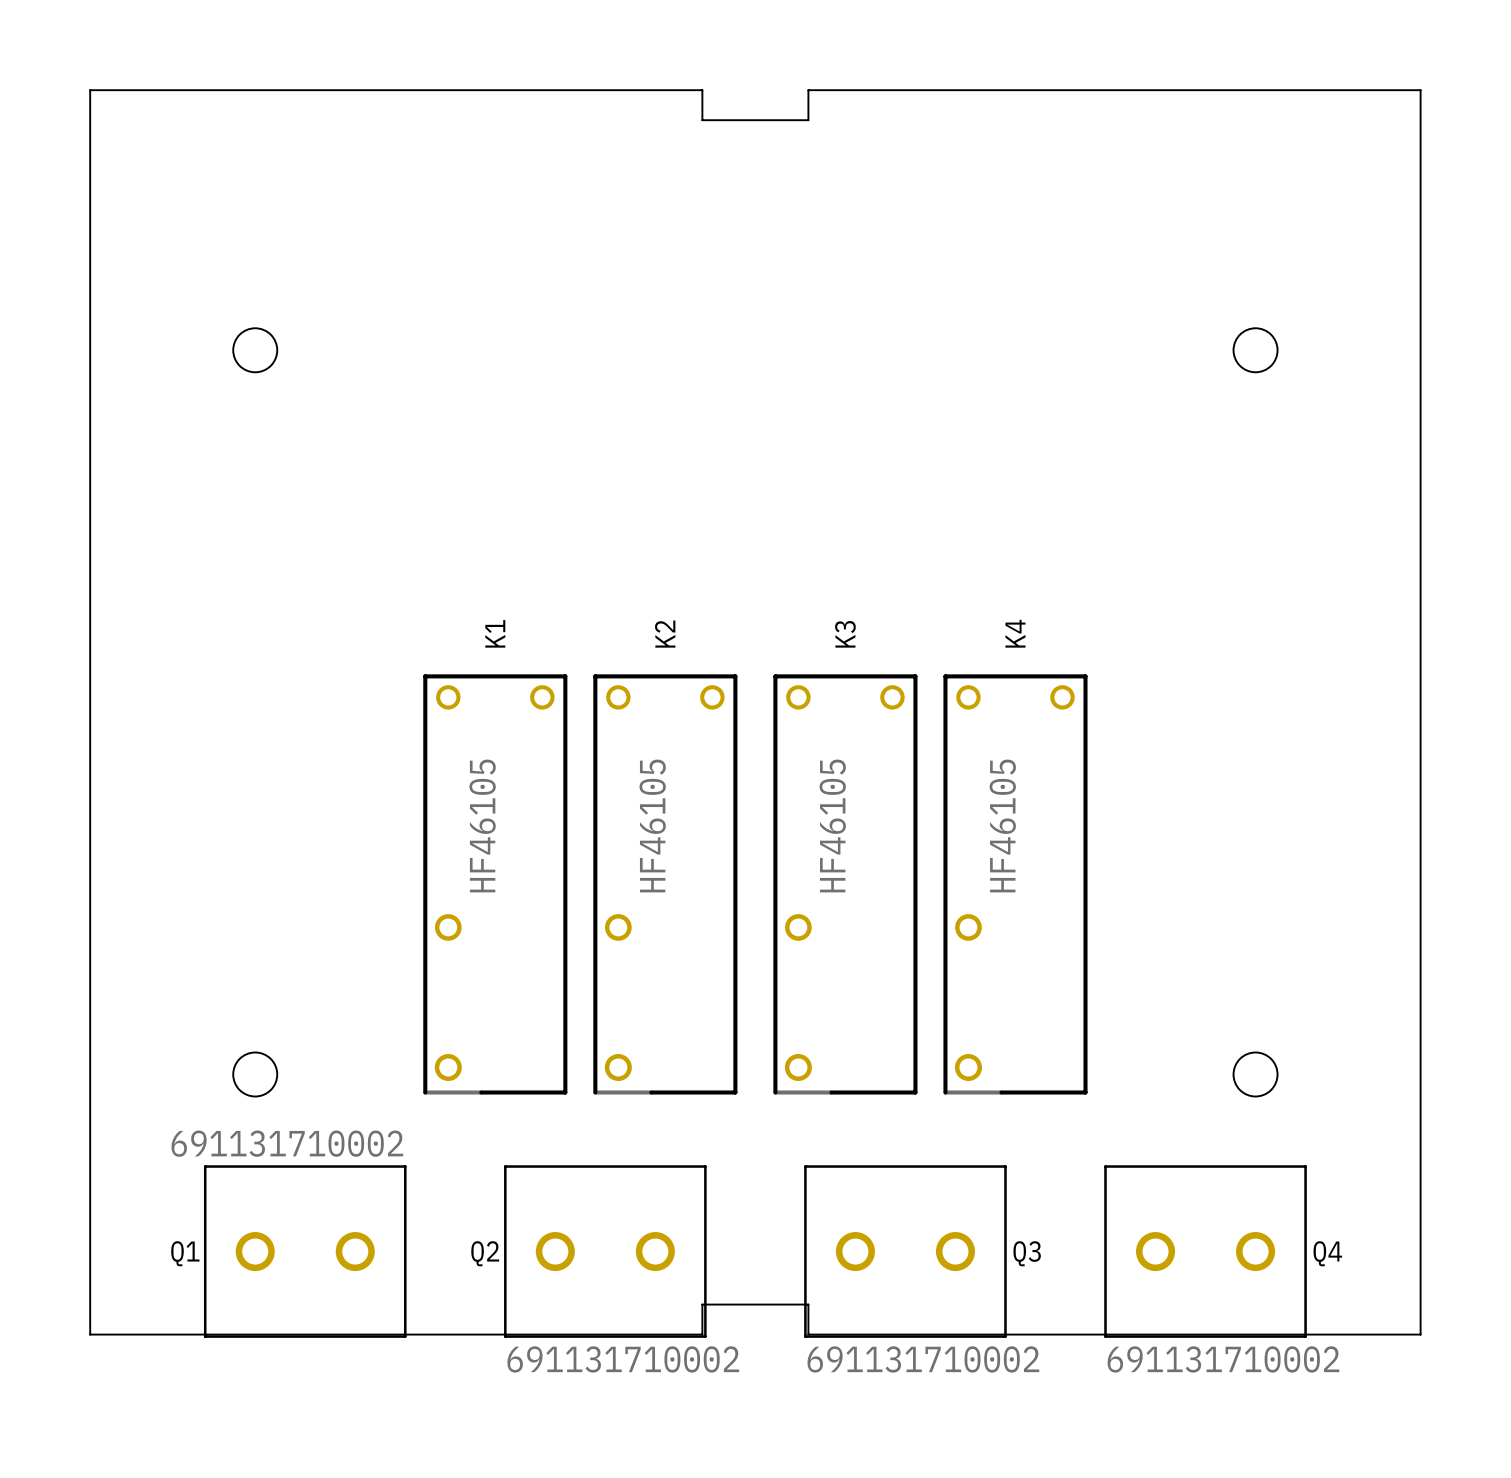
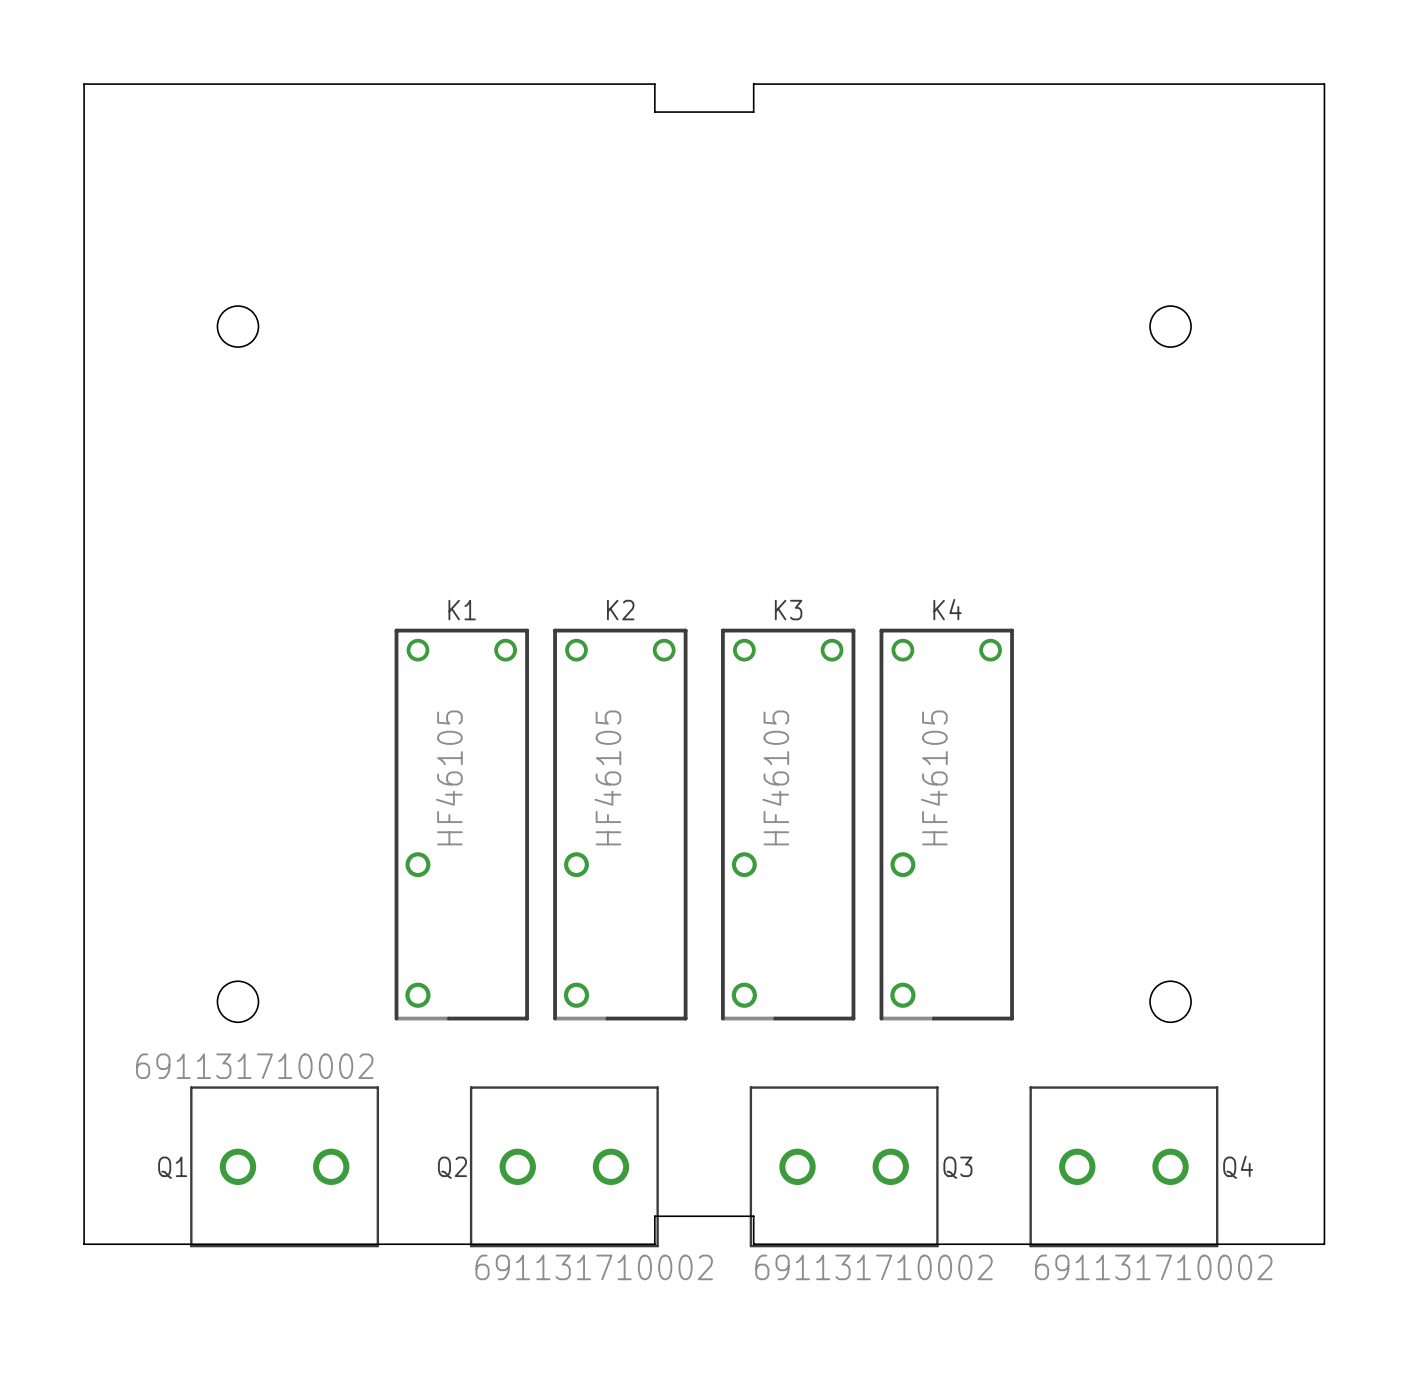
K1 name rotation: 0° (495, 633) -> 90° clockwise (462, 610)
K4 name rotation: 0° (1015, 633) -> 90° clockwise (947, 609)
K2 name rotation: 0° (665, 634) -> 90° clockwise (620, 610)
K3 name rotation: 0° (845, 634) -> 90° clockwise (788, 610)

